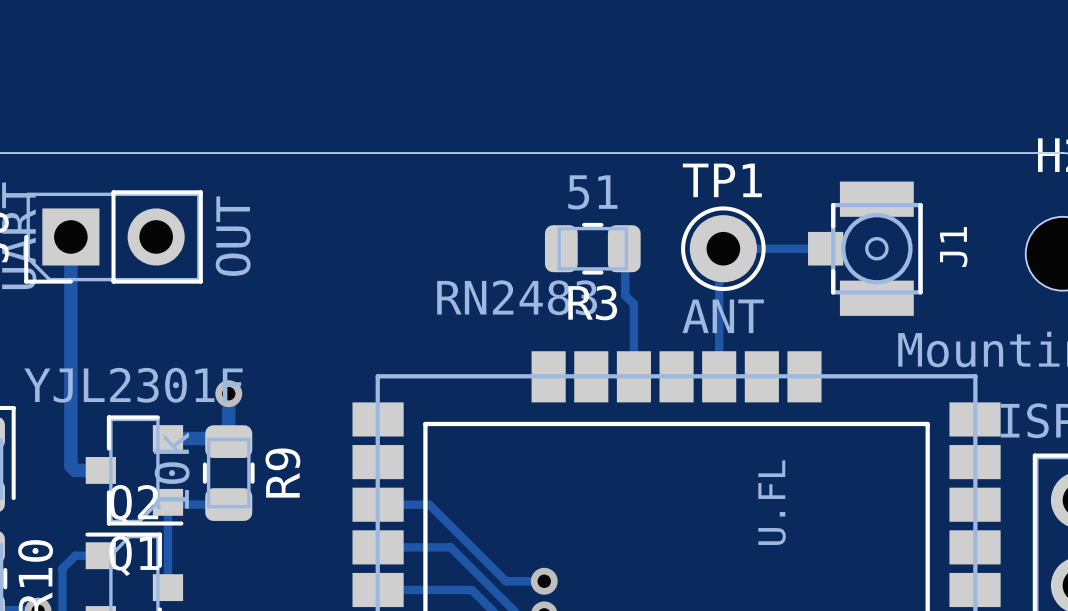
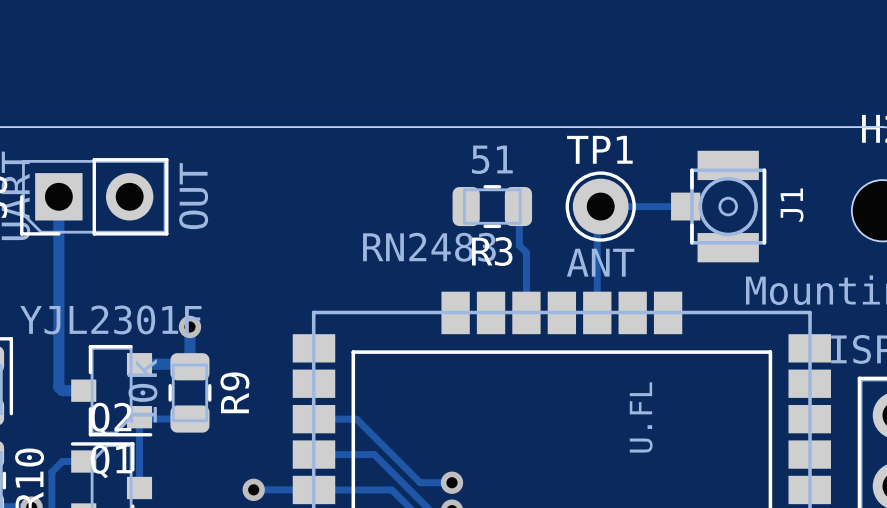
track: none -> (253, 489) (313, 489)
via: none -> (253, 489)

